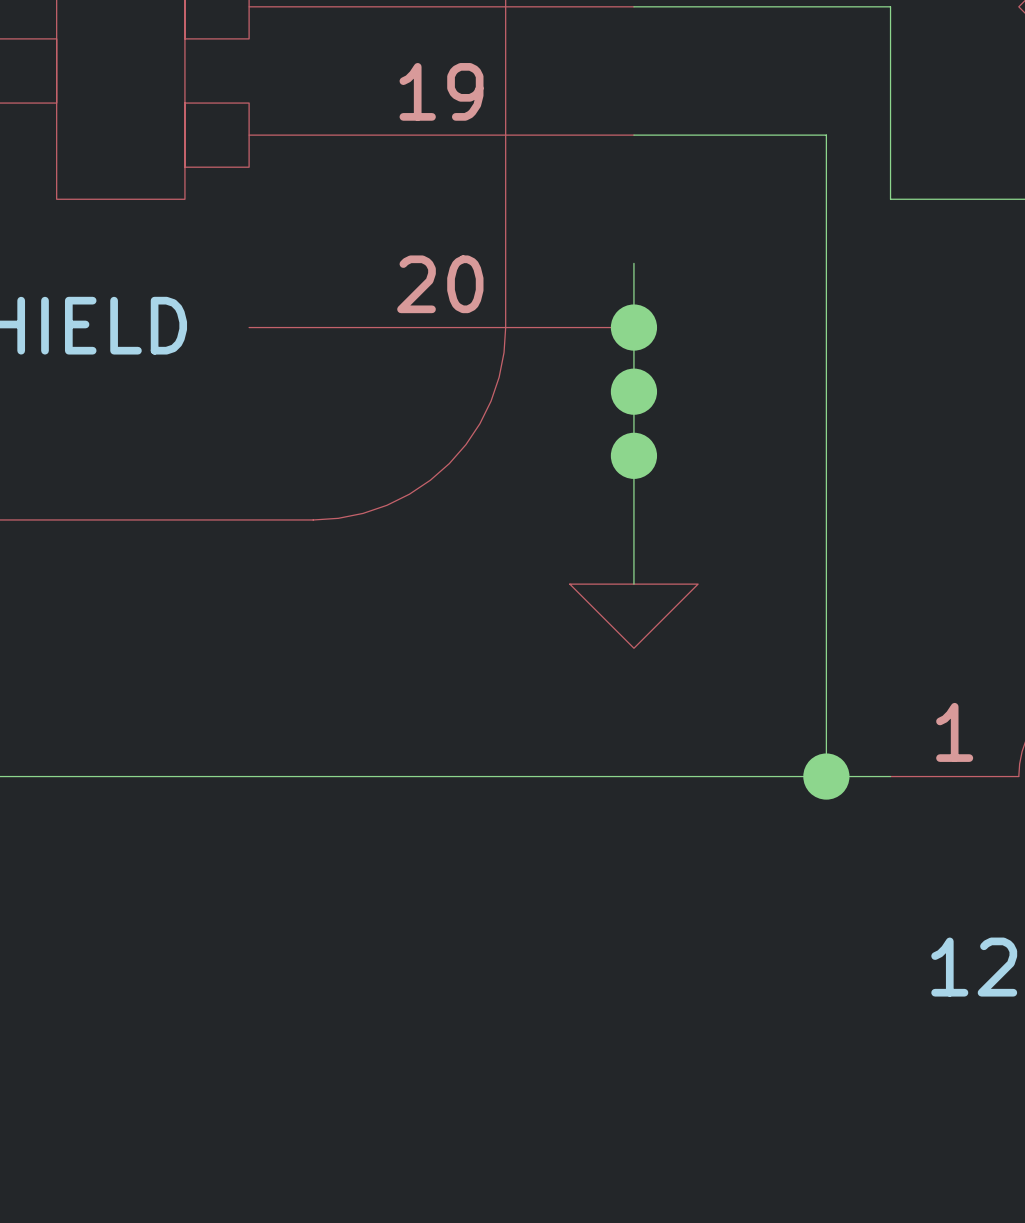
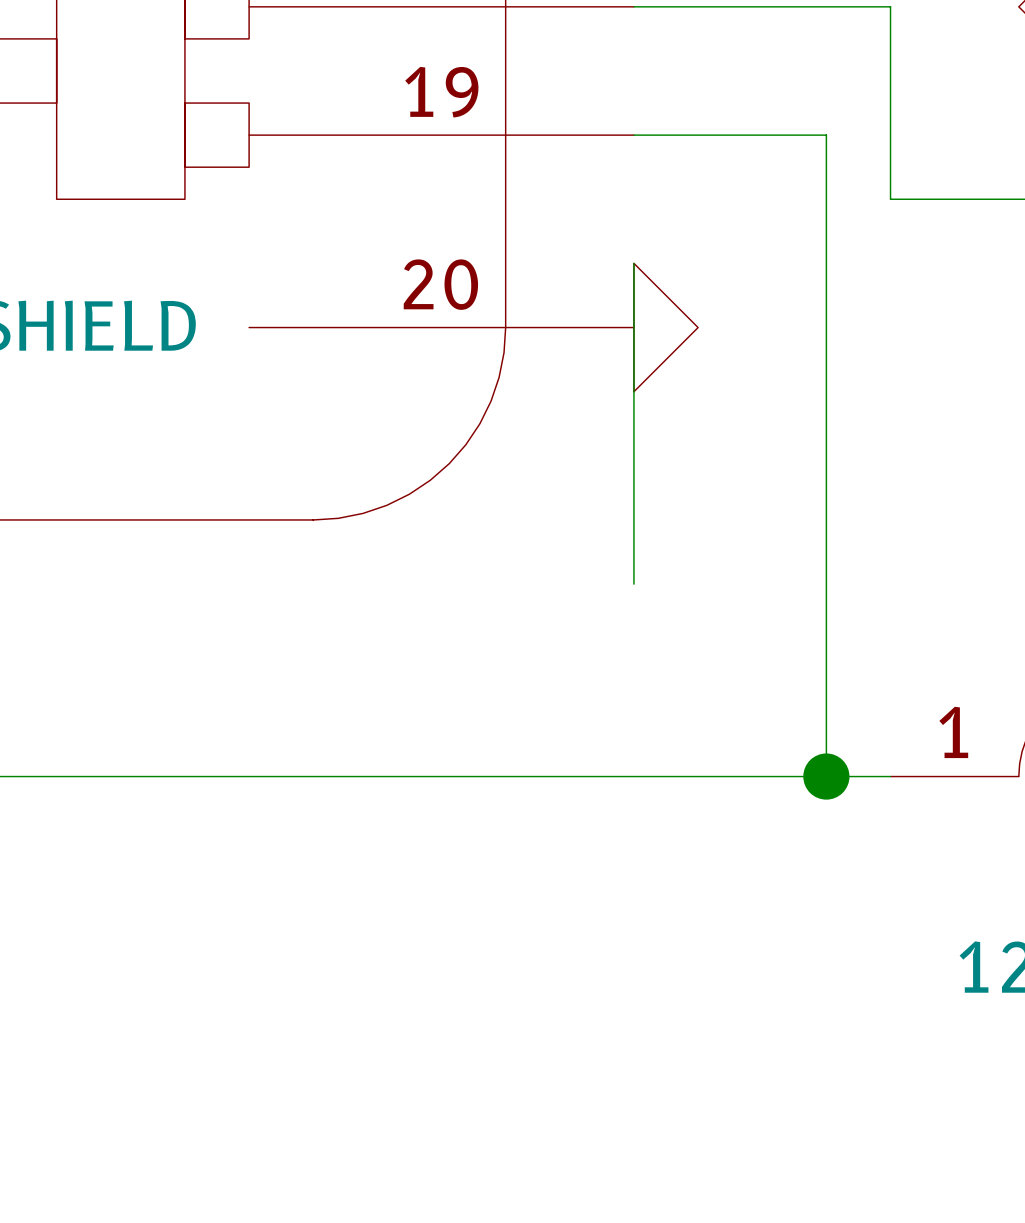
junction: (633, 327) -> none
junction: (633, 391) -> none
junction: (633, 455) -> none
power symbol rotation: 0° (633, 616) -> 90° counterclockwise (666, 327)
power symbol position: (633, 616) -> (666, 327)

